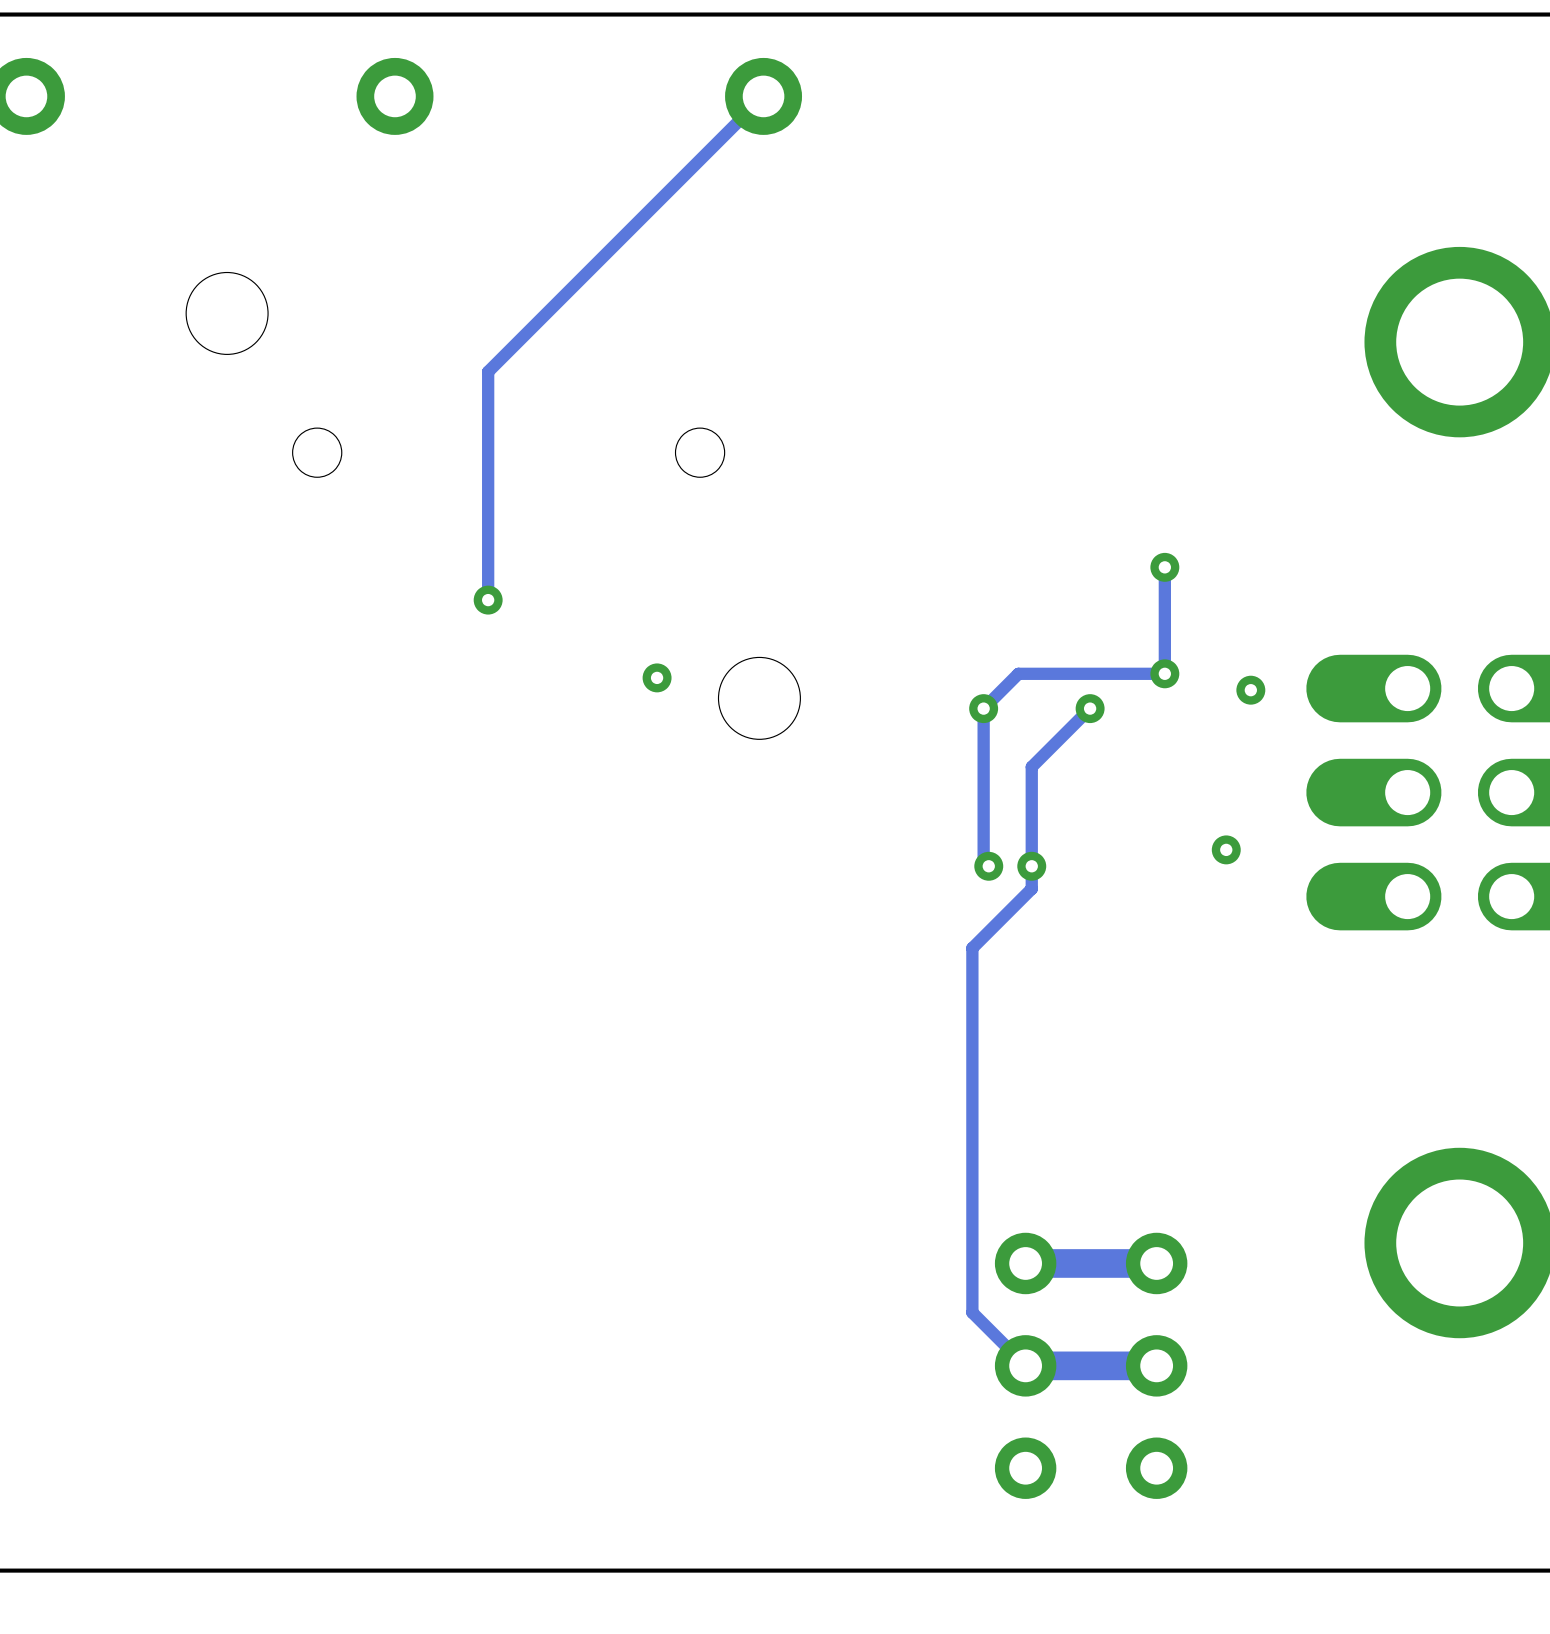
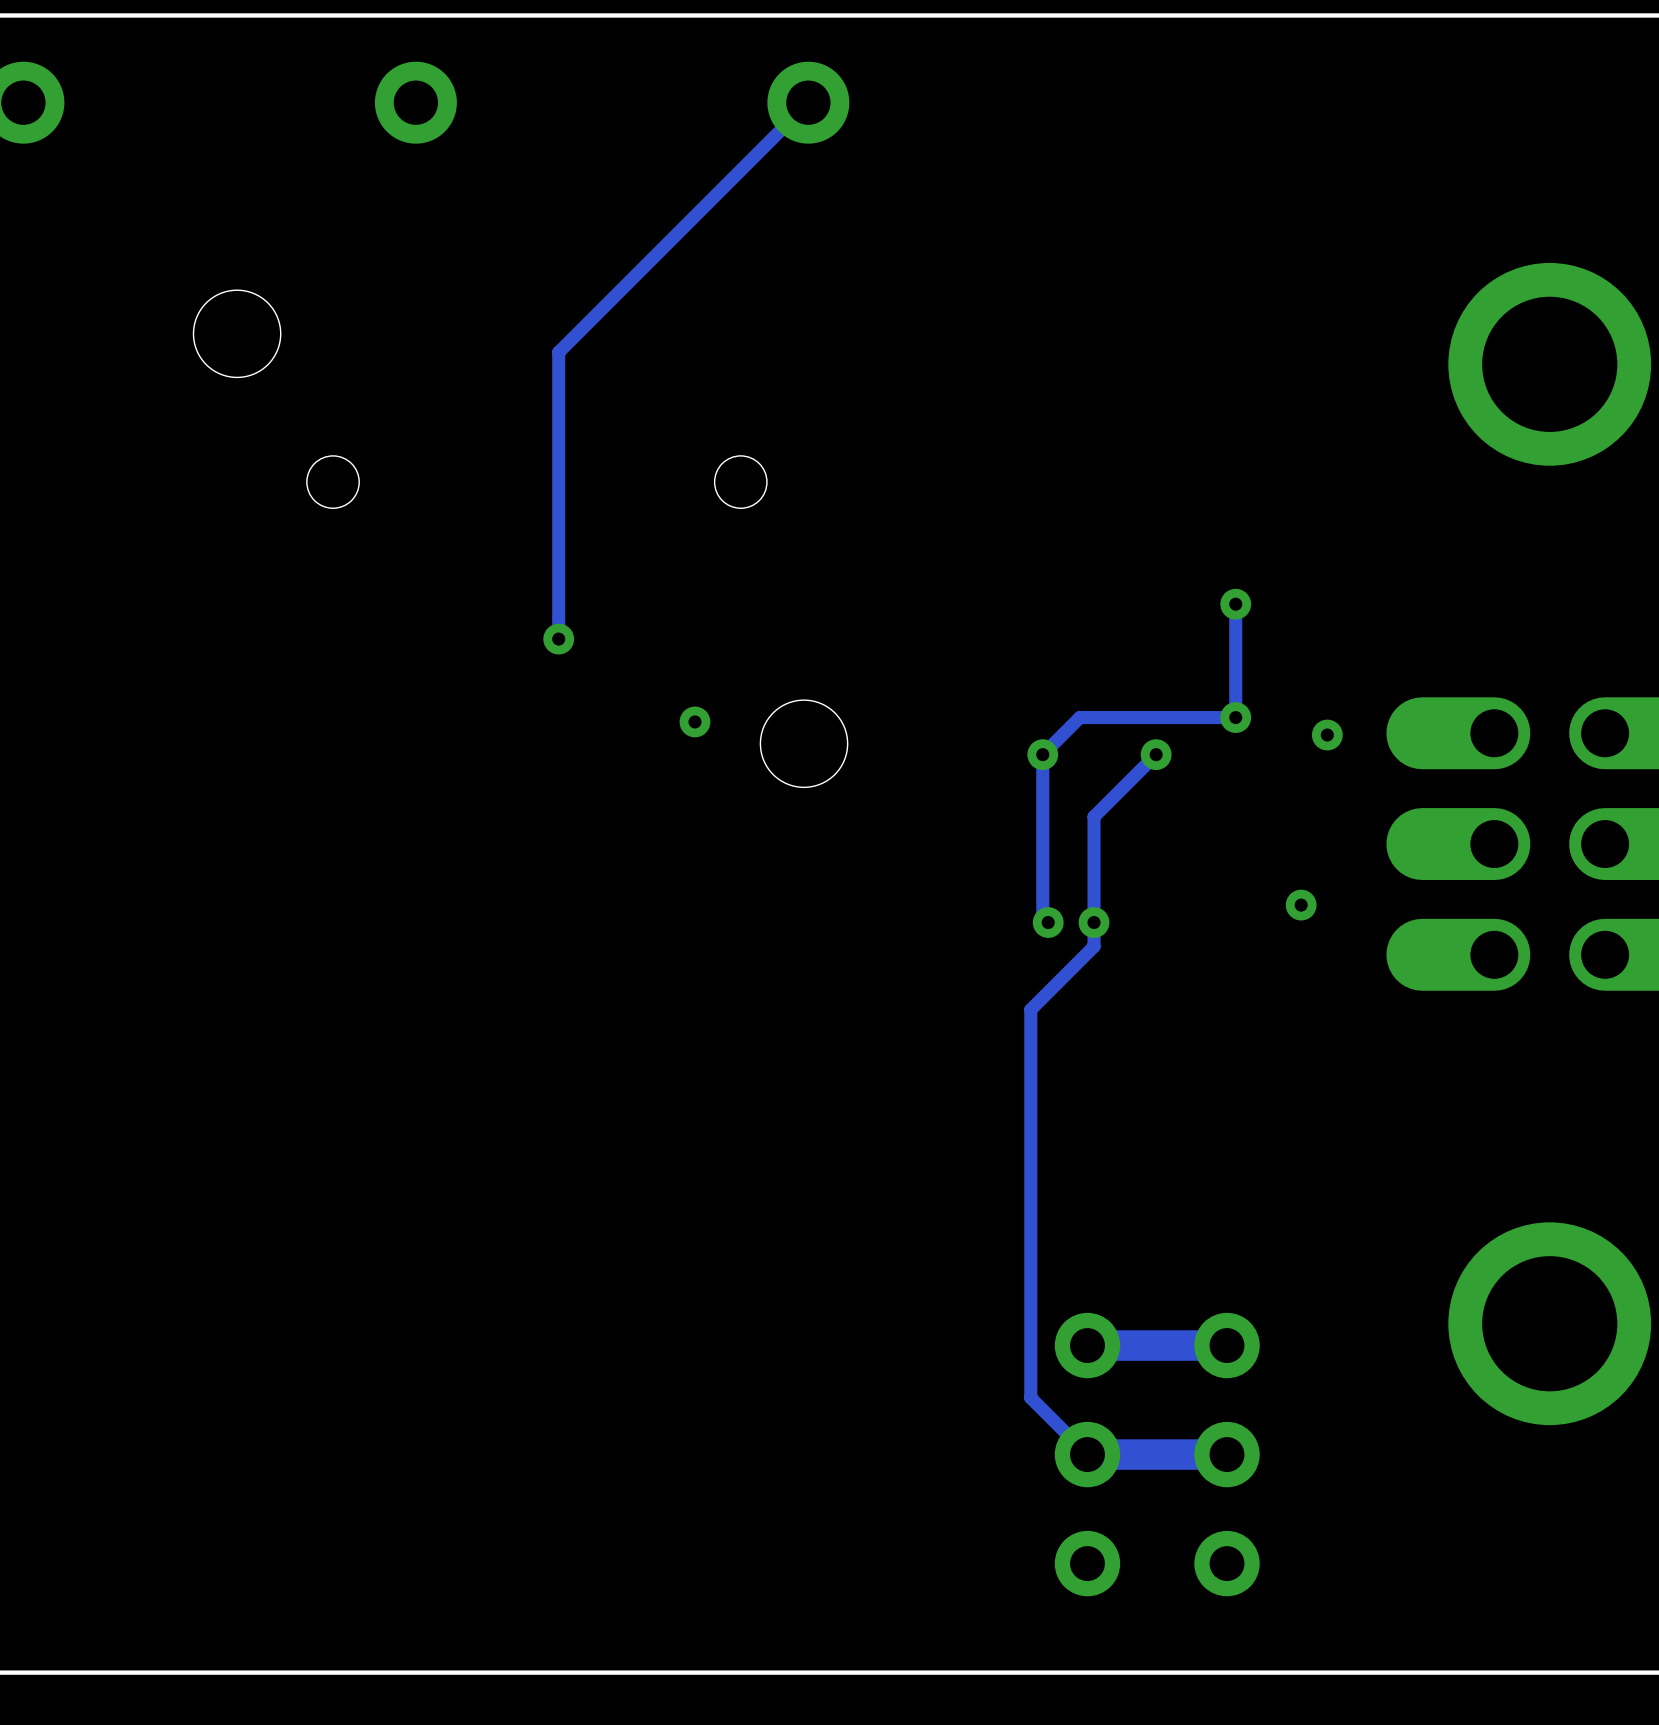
track: (529, 330) (488, 371) (488, 600) -> (558, 352) (558, 639)
via position: (488, 600) -> (558, 639)

